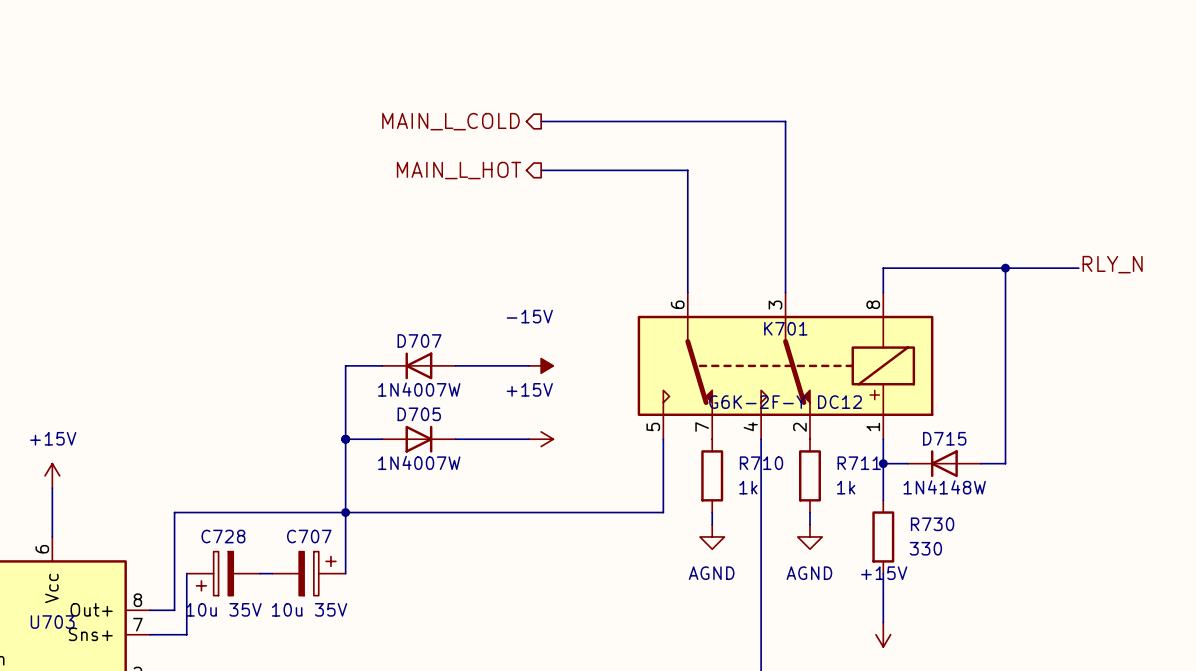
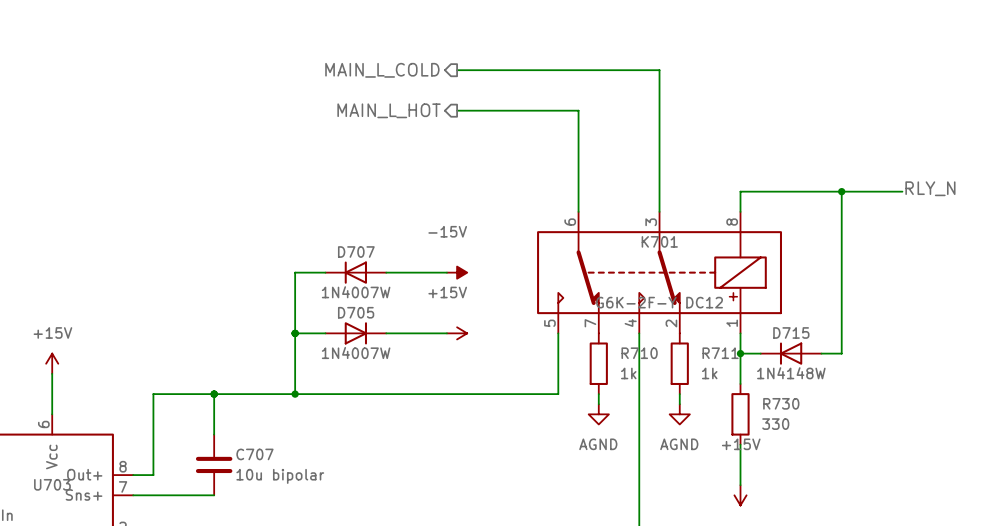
wire: none -> (214, 394) (214, 434)
junction: none -> (214, 394)
wire: (345, 512) (345, 573) -> none
C707 name position: C707 (309, 536) -> C707 (254, 454)
C707 symbol: [272, 551, 346, 596] -> [195, 434, 233, 496]
wire: (186, 573) (186, 634) -> (214, 495) (163, 495)
C728: 10u 35V (223, 573) -> none
wire: (260, 573) (272, 573) -> none
C707 value: 10u 35V (309, 609) -> 10u bipolar (280, 476)

